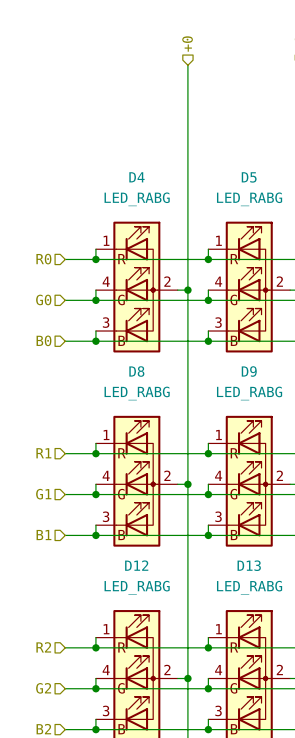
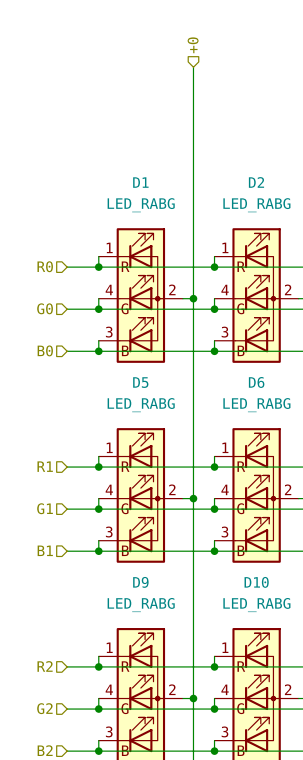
D4 name: D4 (136, 177) -> D1 (140, 182)
D5 name: D5 (249, 177) -> D2 (256, 182)
D8 name: D8 (136, 371) -> D5 (140, 382)
D9 name: D9 (249, 371) -> D6 (256, 382)
D12 name: D12 (136, 565) -> D9 (140, 582)
D13 name: D13 (249, 565) -> D10 (256, 582)

